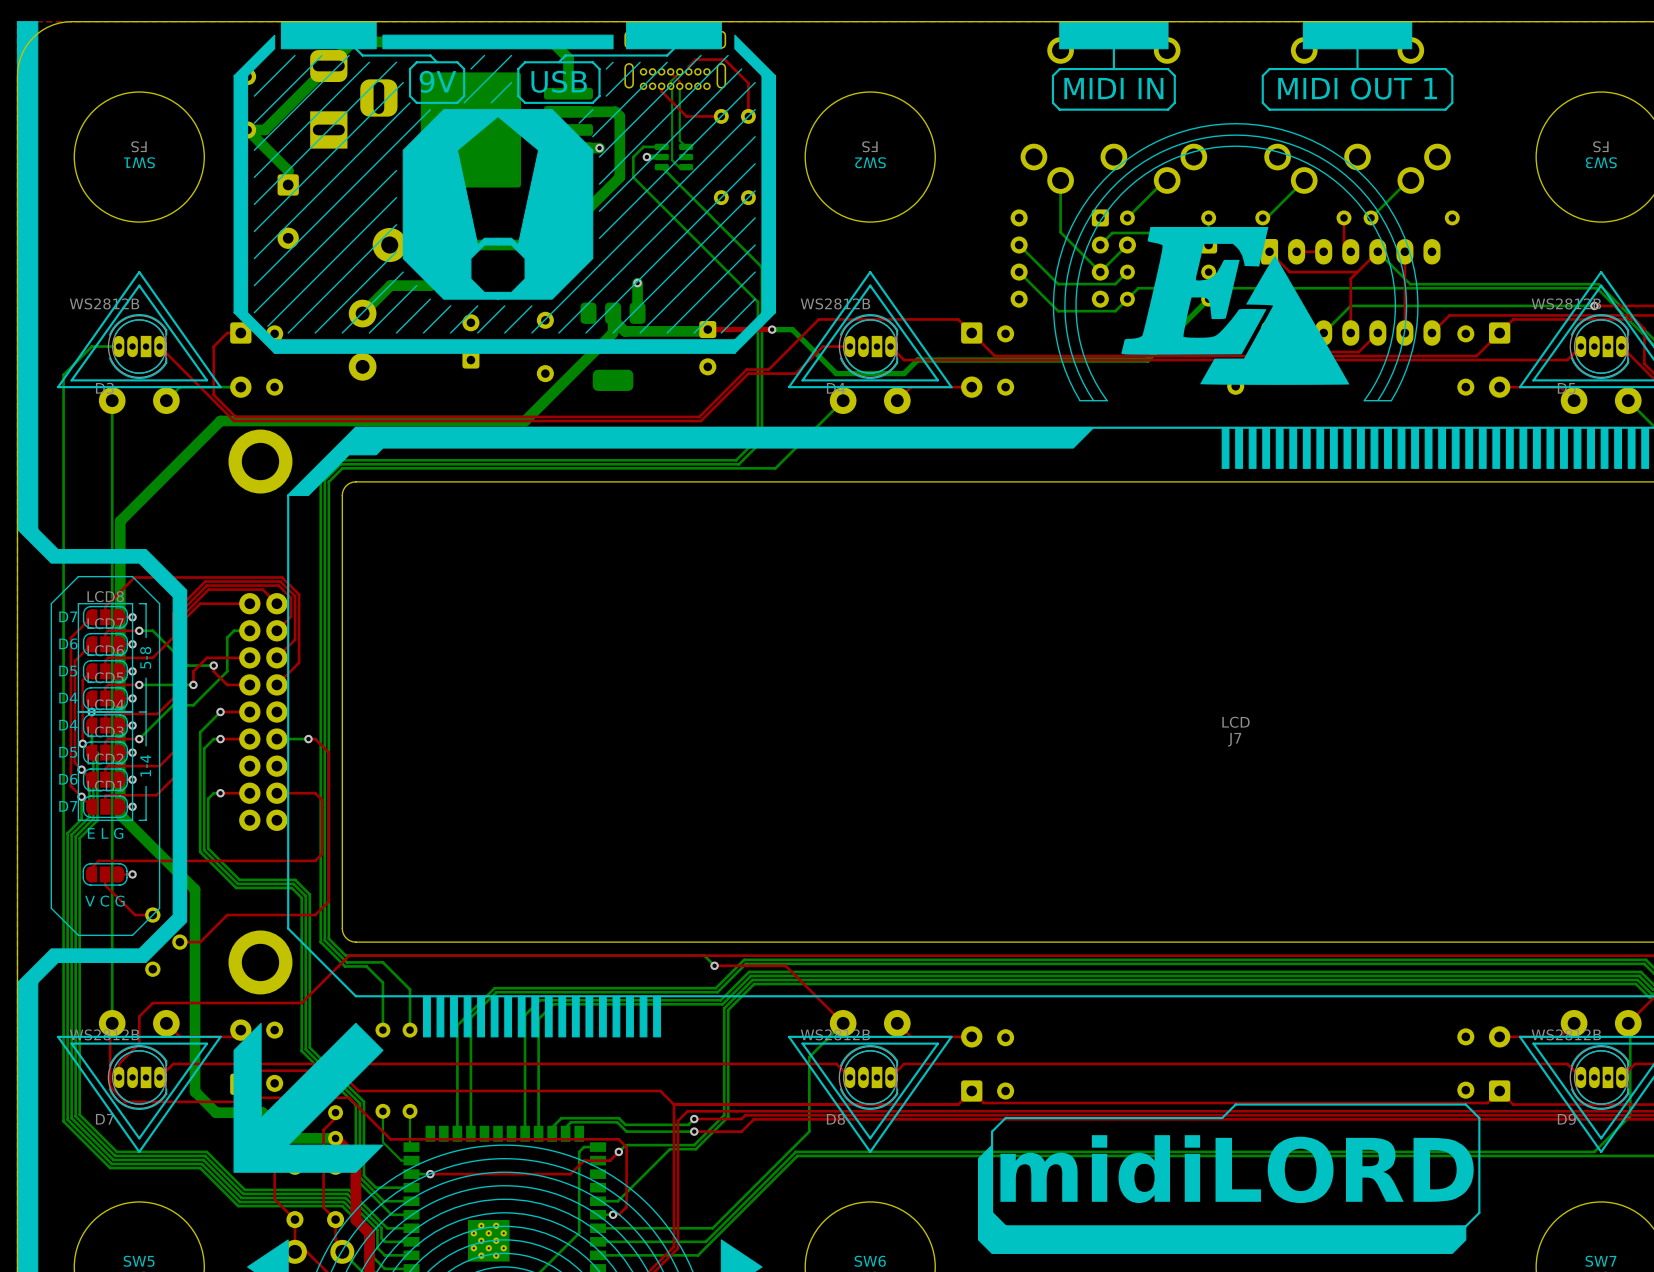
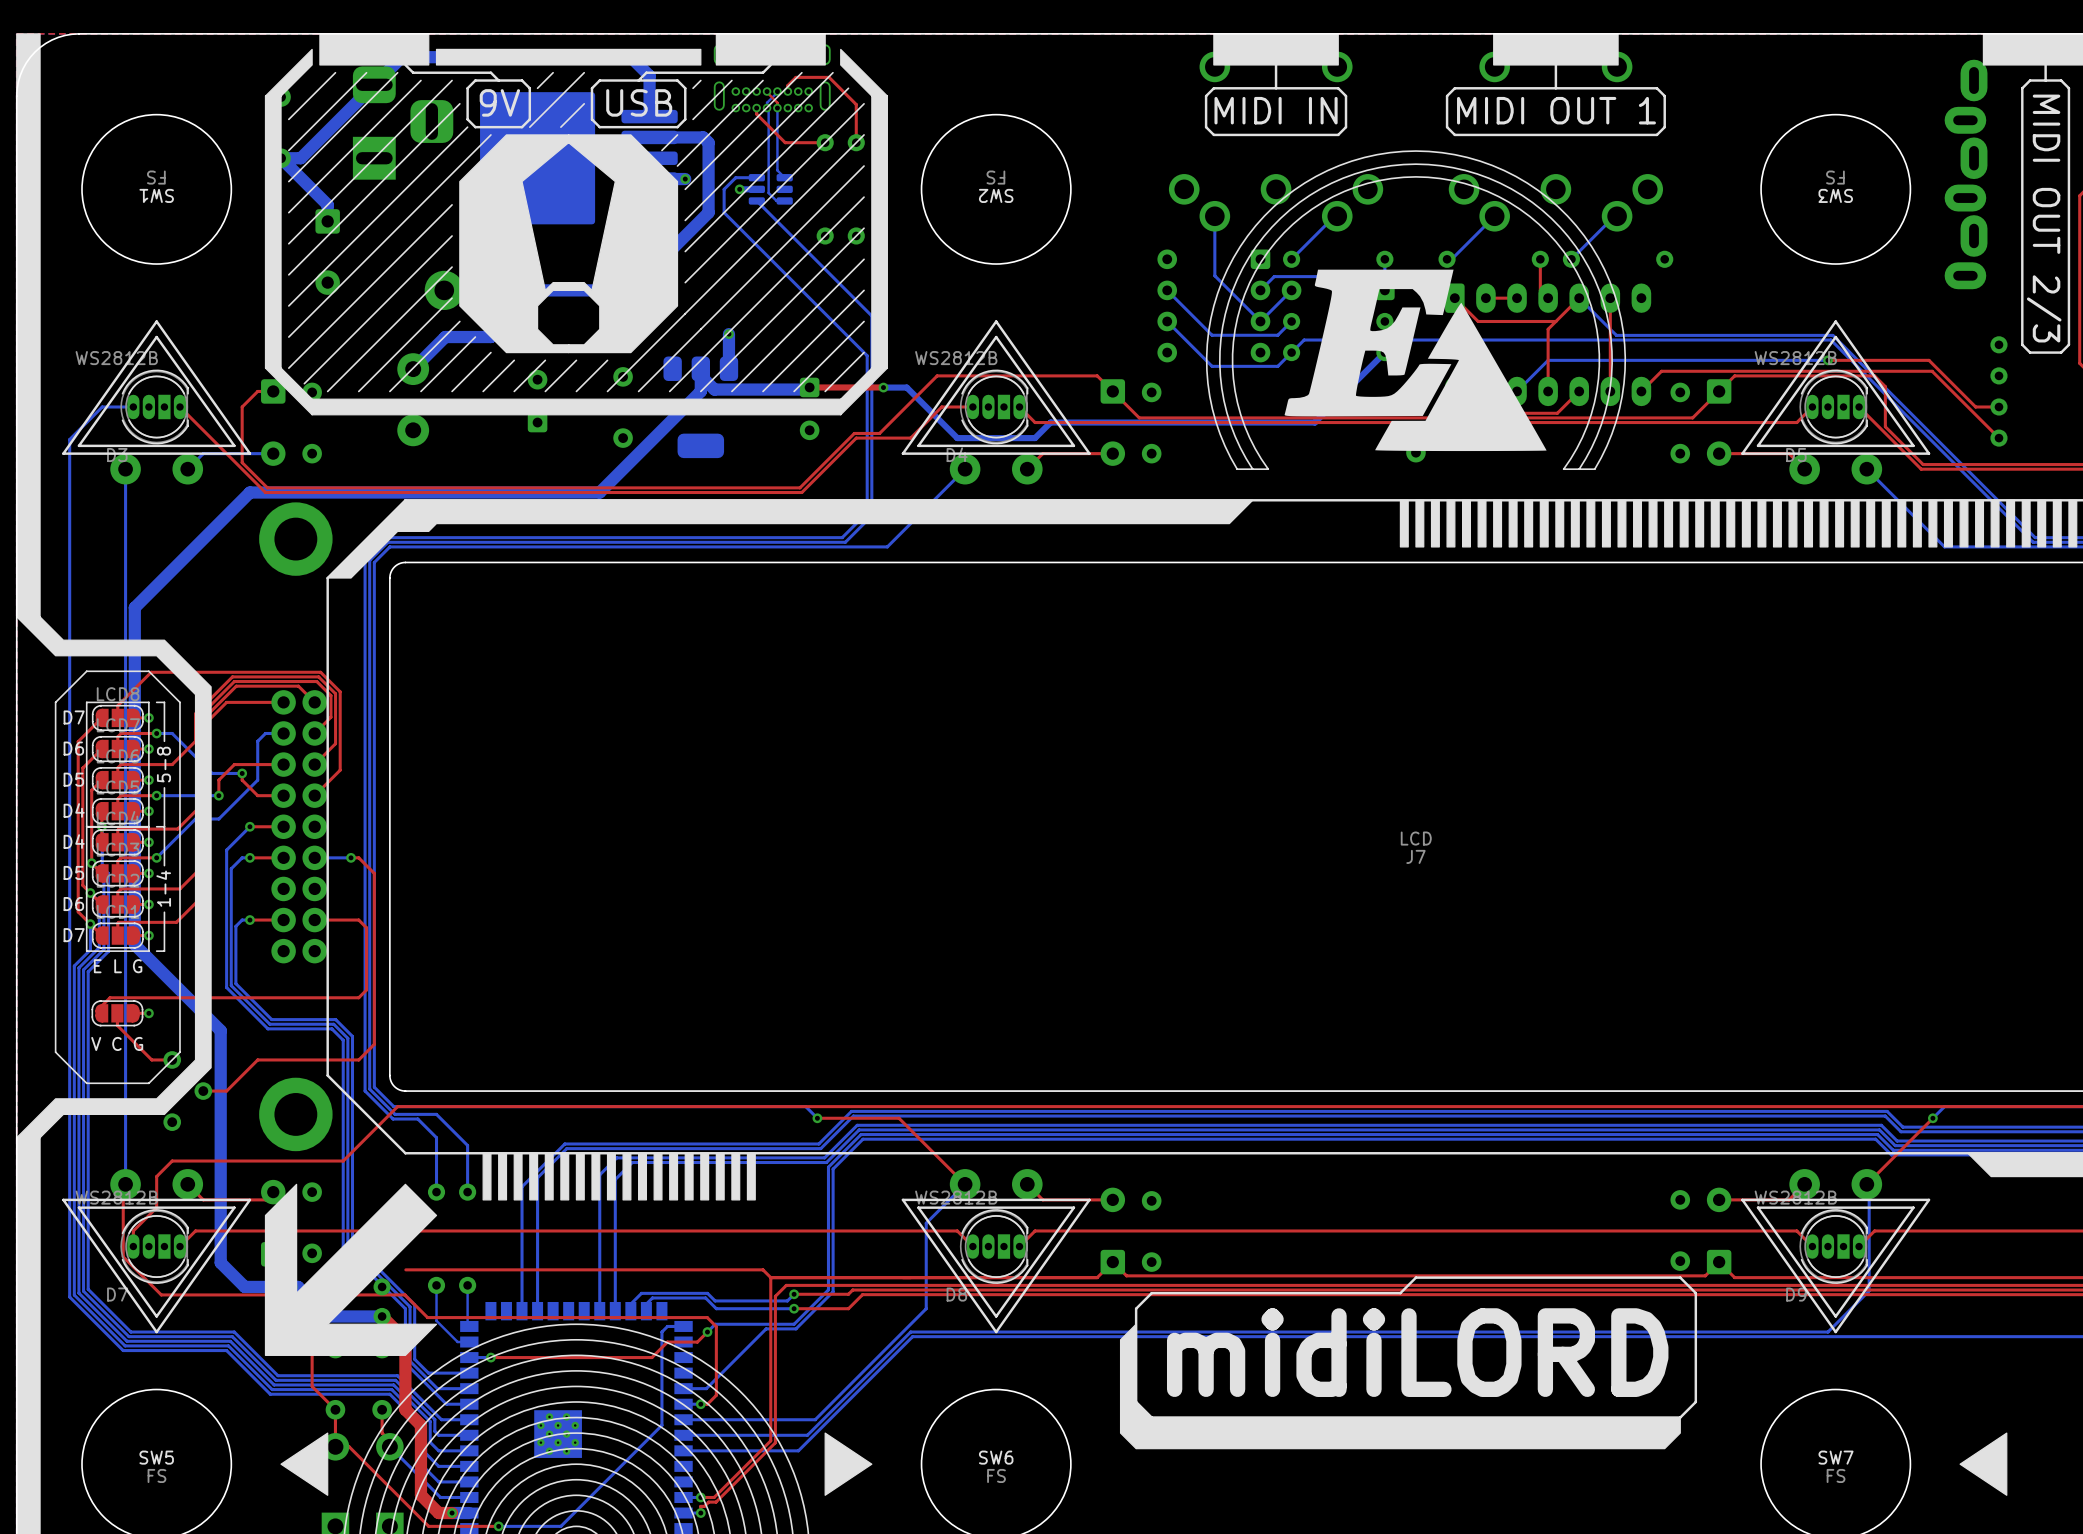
bottom track: (309, 1047) (363, 1101) (363, 1128) -> (352, 1212) (352, 1242) (414, 1304)
bottom track: (305, 1049) (359, 1103) (359, 1129) -> (347, 1214) (347, 1244) (410, 1306)
bottom track: (301, 1050) (355, 1105) (355, 1131) -> (343, 1216) (343, 1246) (405, 1308)
top track: (240, 1084) (240, 1091) (261, 1070) (338, 1070) (358, 1091) (660, 1091) (667, 1097) -> (405, 1269) (763, 1269)
top track: (125, 1101) (252, 1101) (256, 1097) (349, 1097) (390, 1139) -> (140, 1274) (161, 1294) (404, 1294) (427, 1317) (445, 1317)
top track: (335, 1112) (335, 1118) (323, 1130) (323, 1207) (335, 1219) -> none

